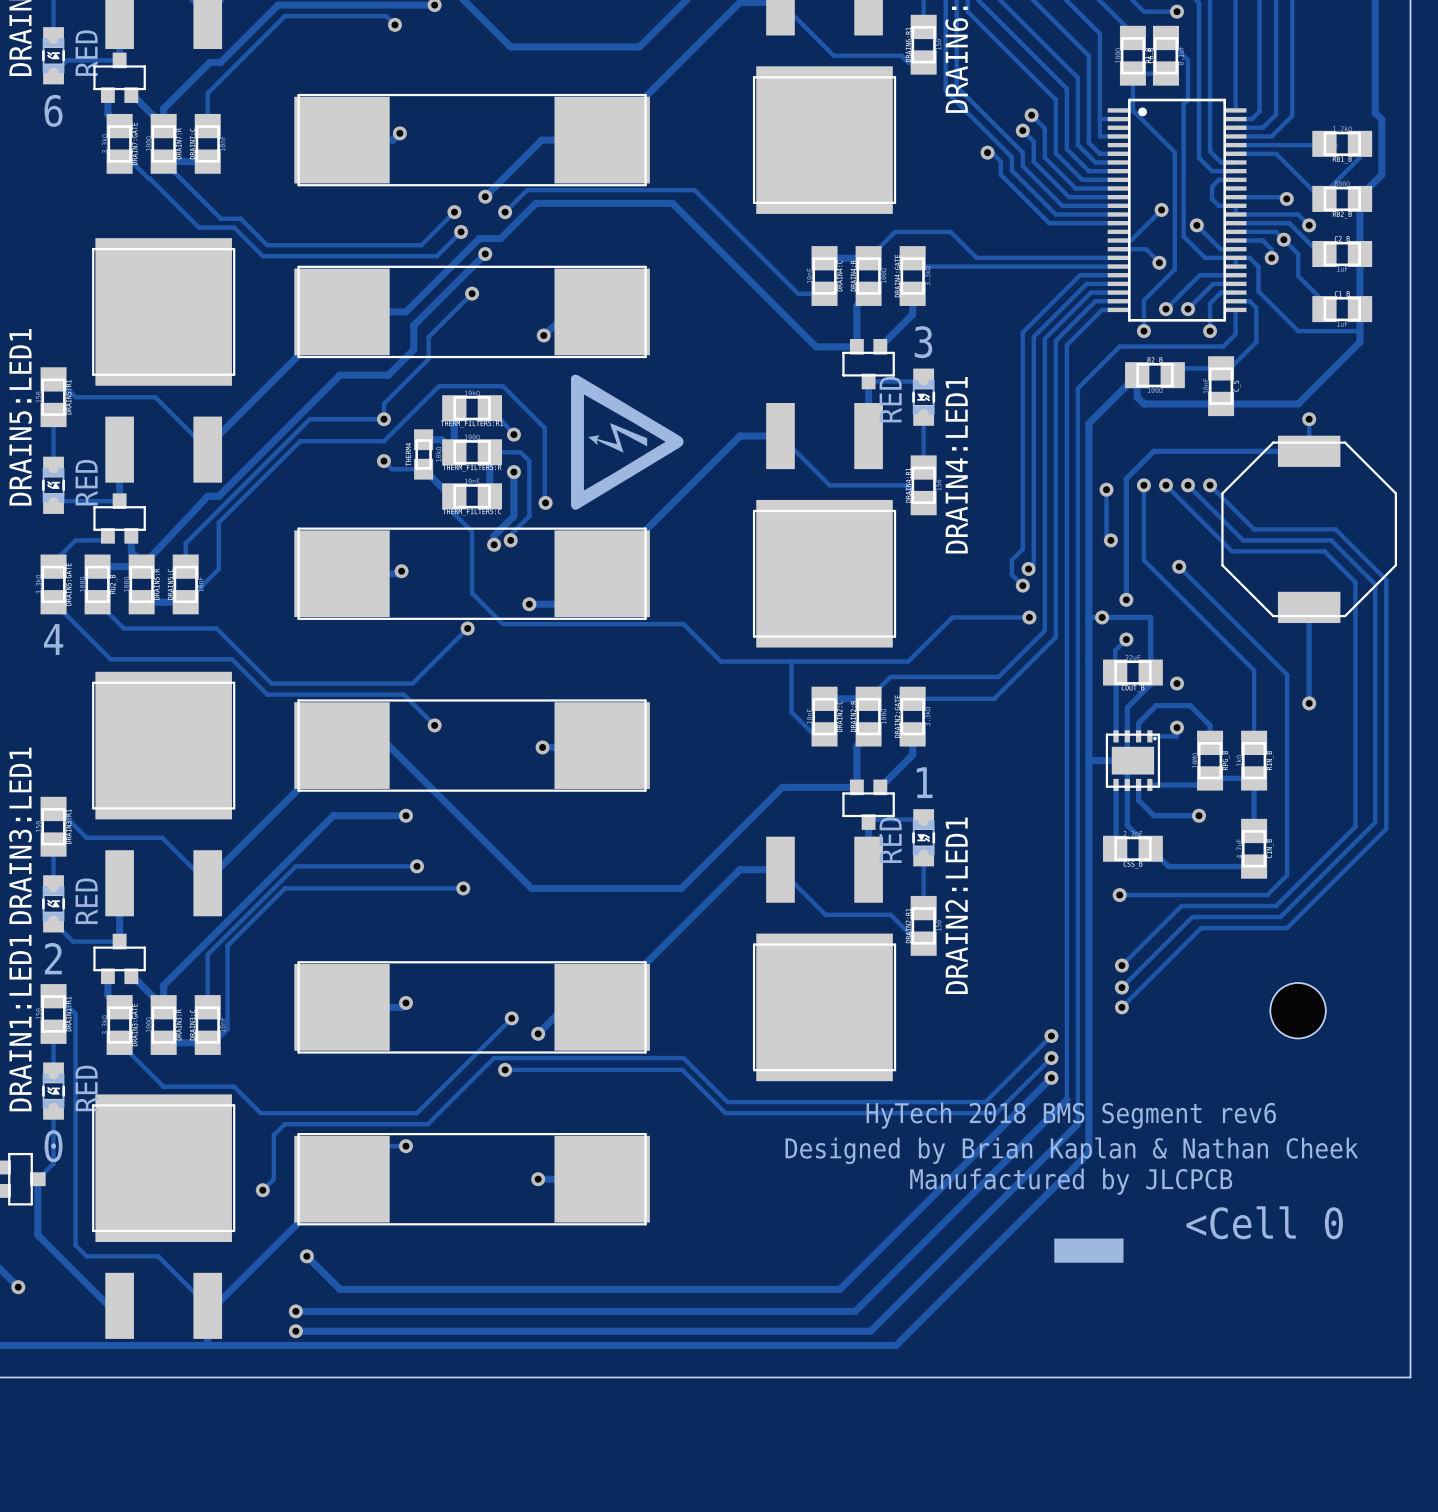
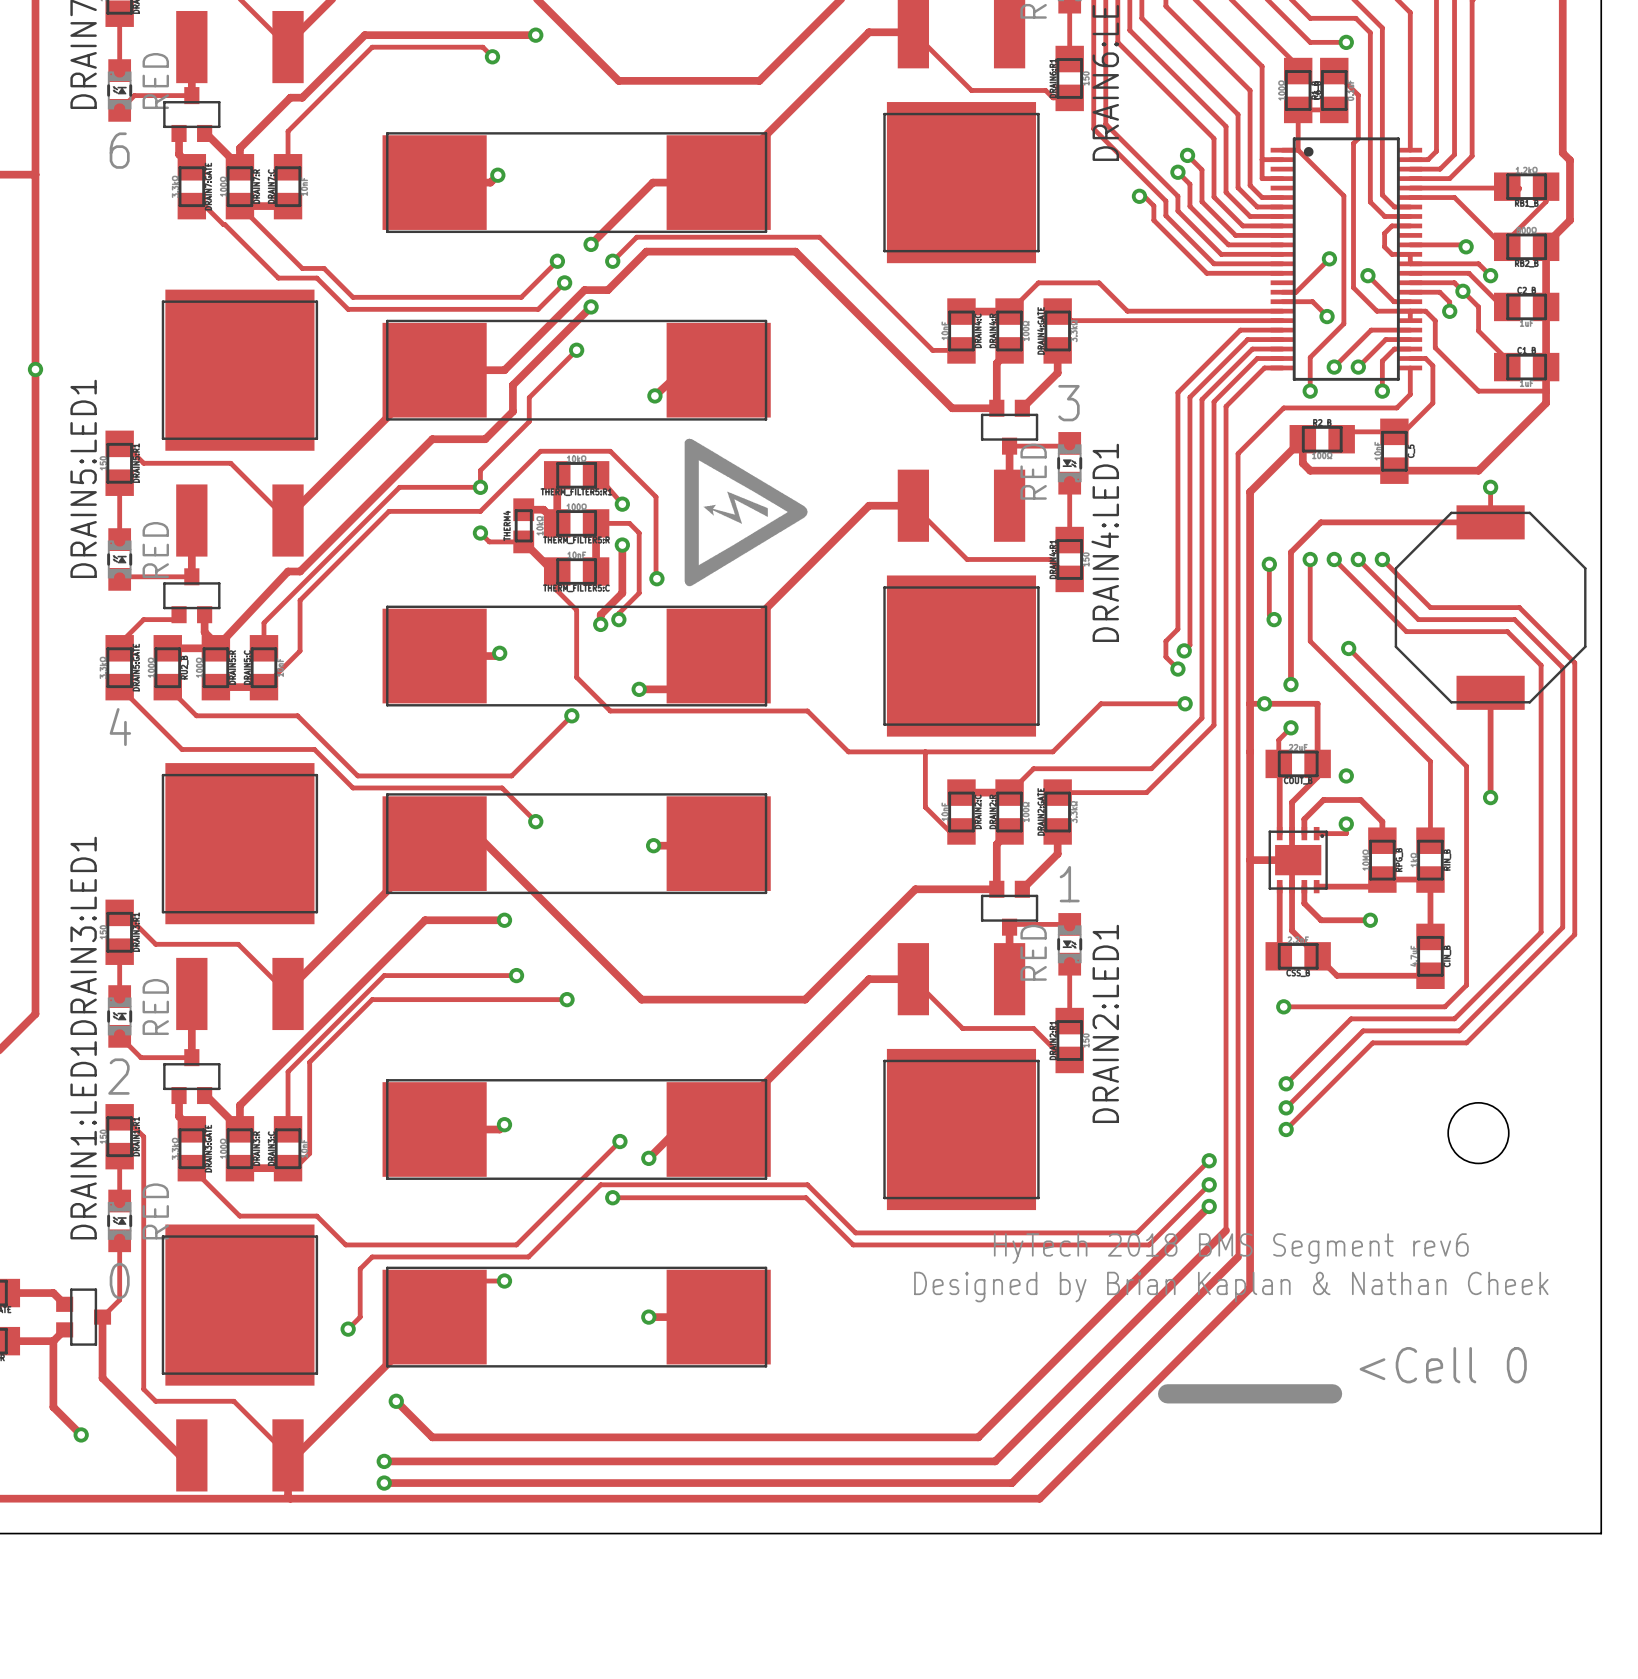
text: Manufactured by JLCPCB (1071, 1181) -> none

